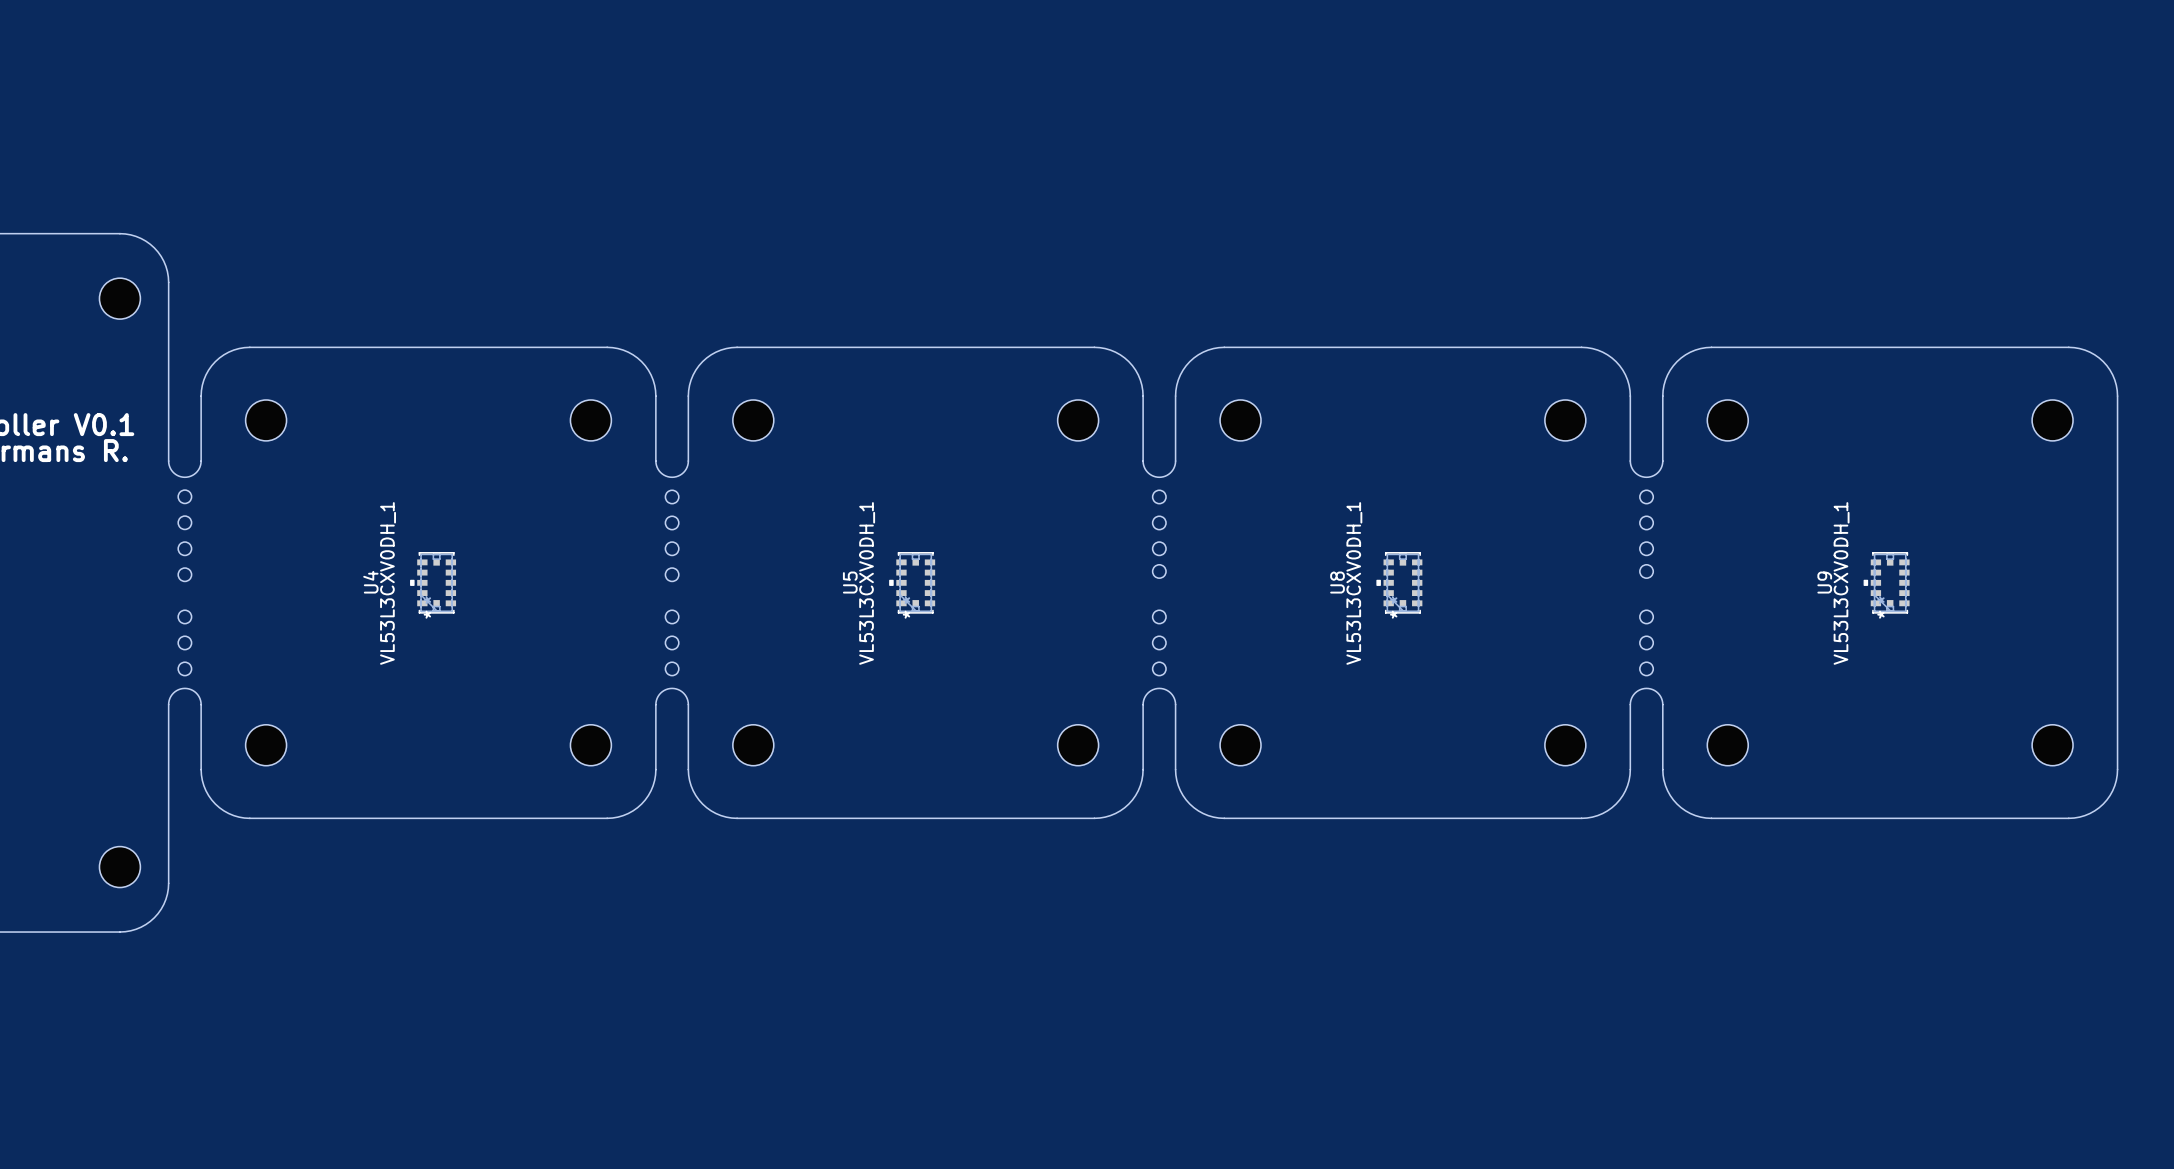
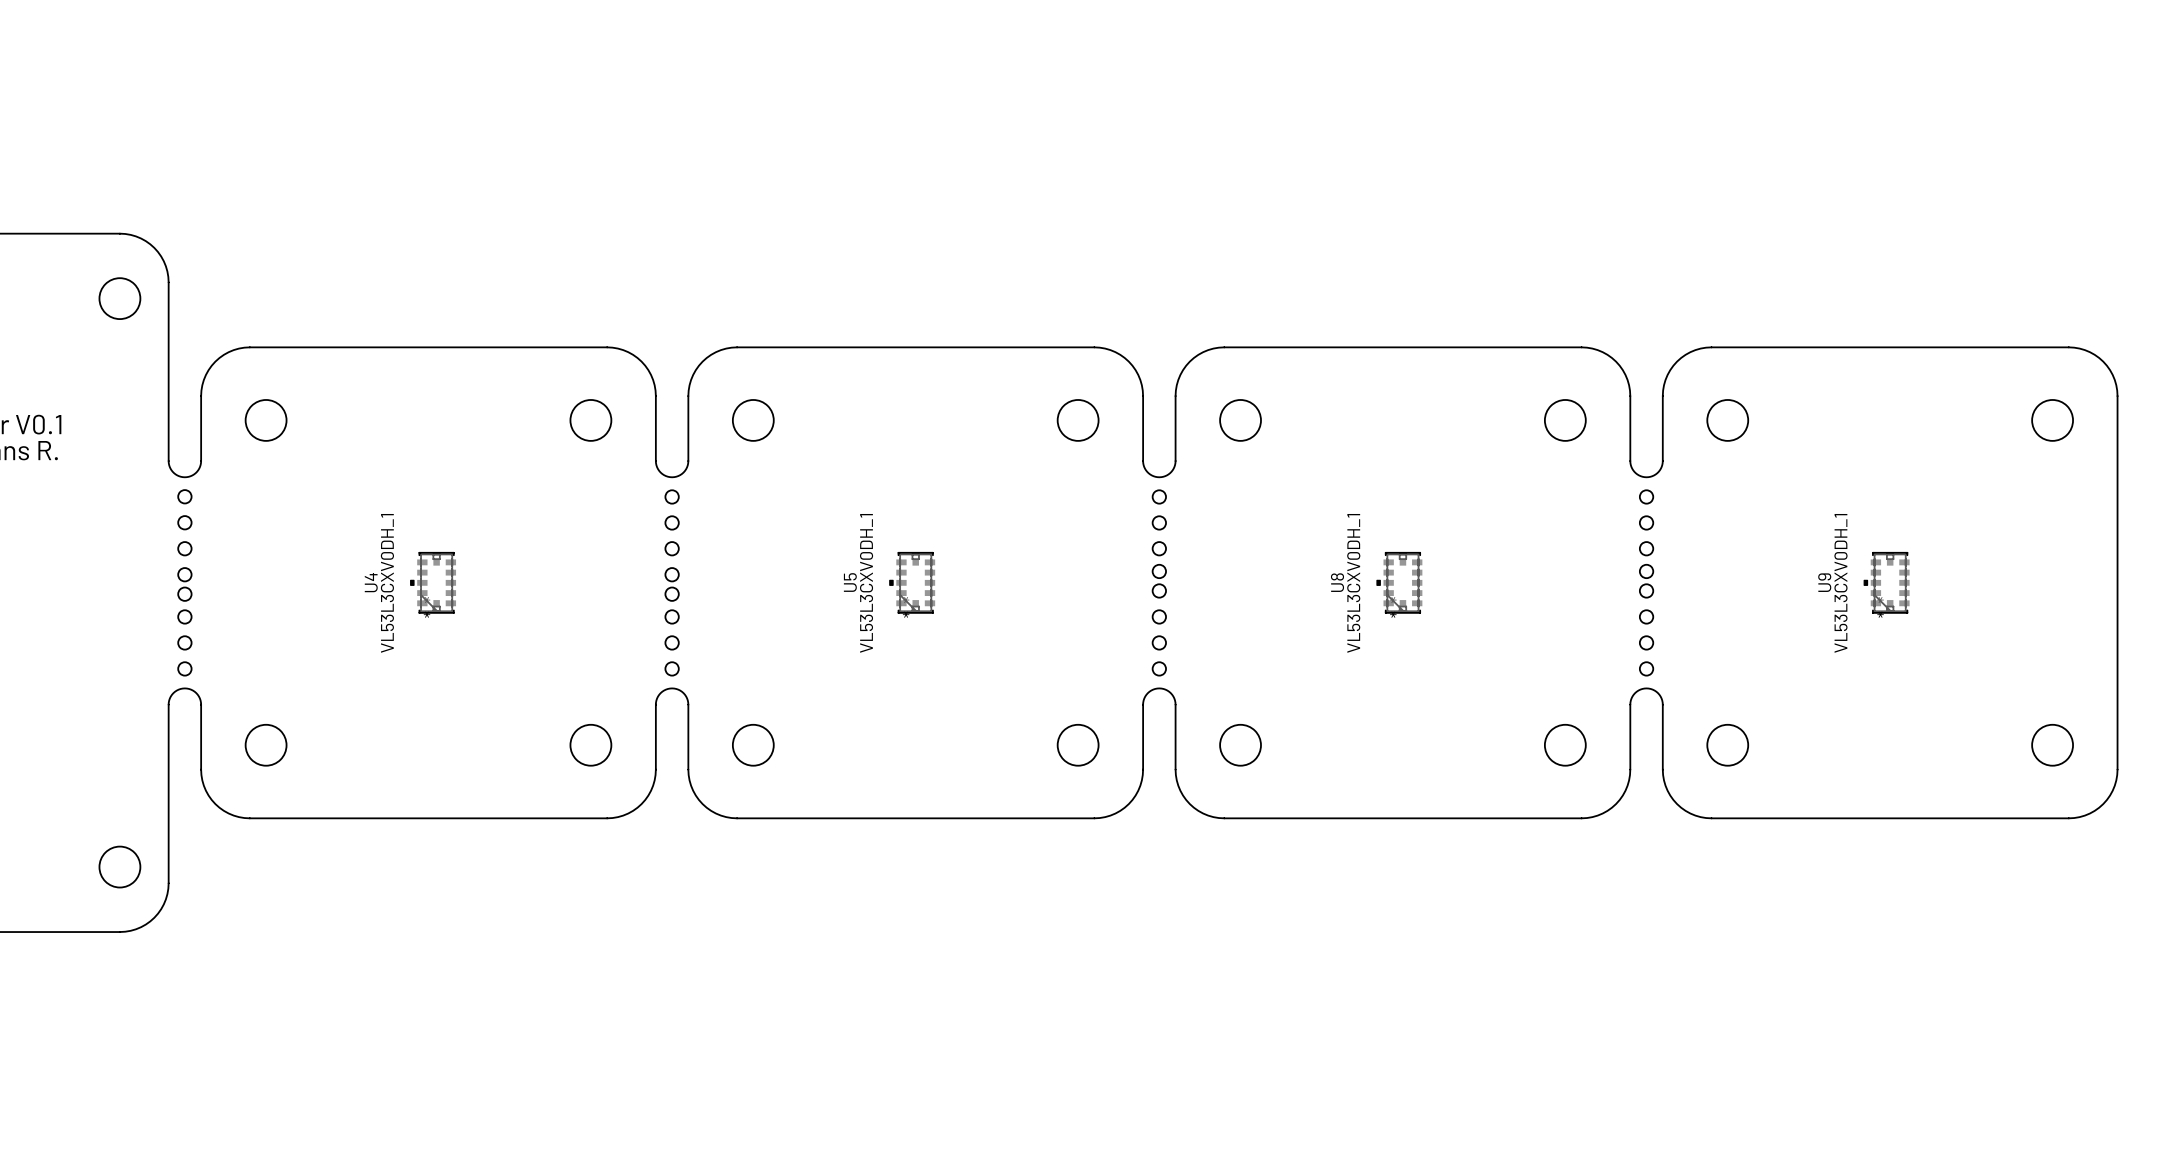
round board edge: none -> [1152, 583, 1167, 598]
round board edge: none -> [1639, 583, 1654, 598]
round board edge: none -> [177, 587, 192, 602]
round board edge: none -> [665, 587, 680, 602]

